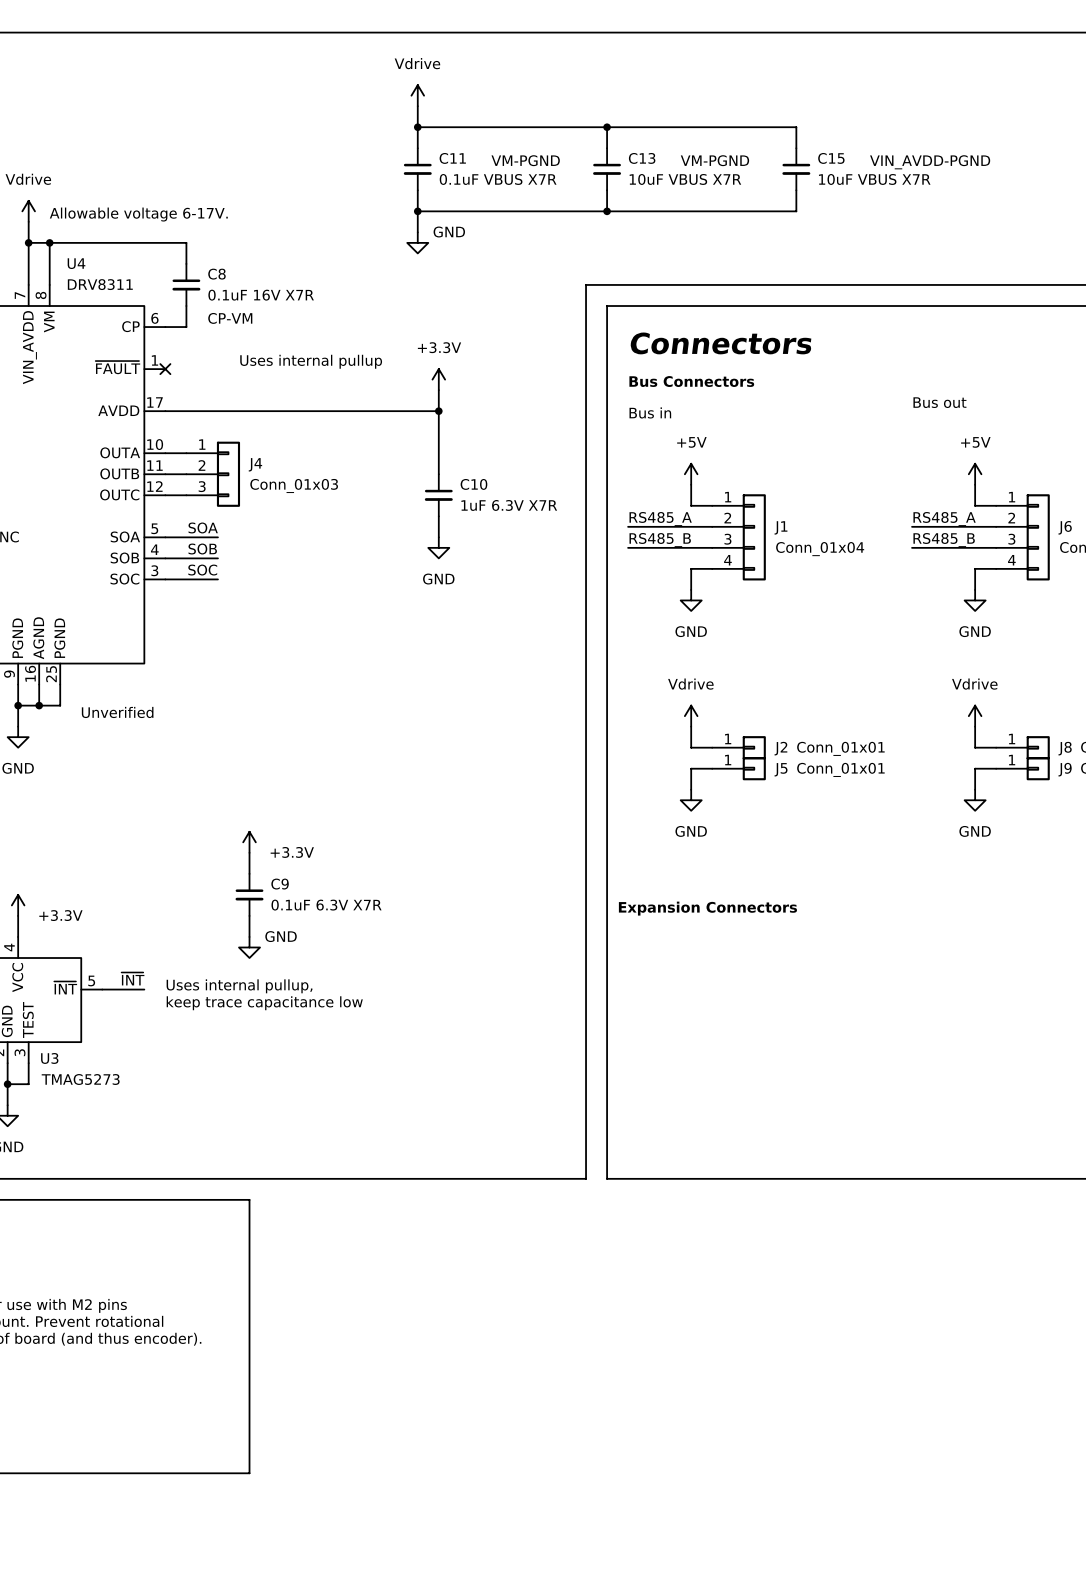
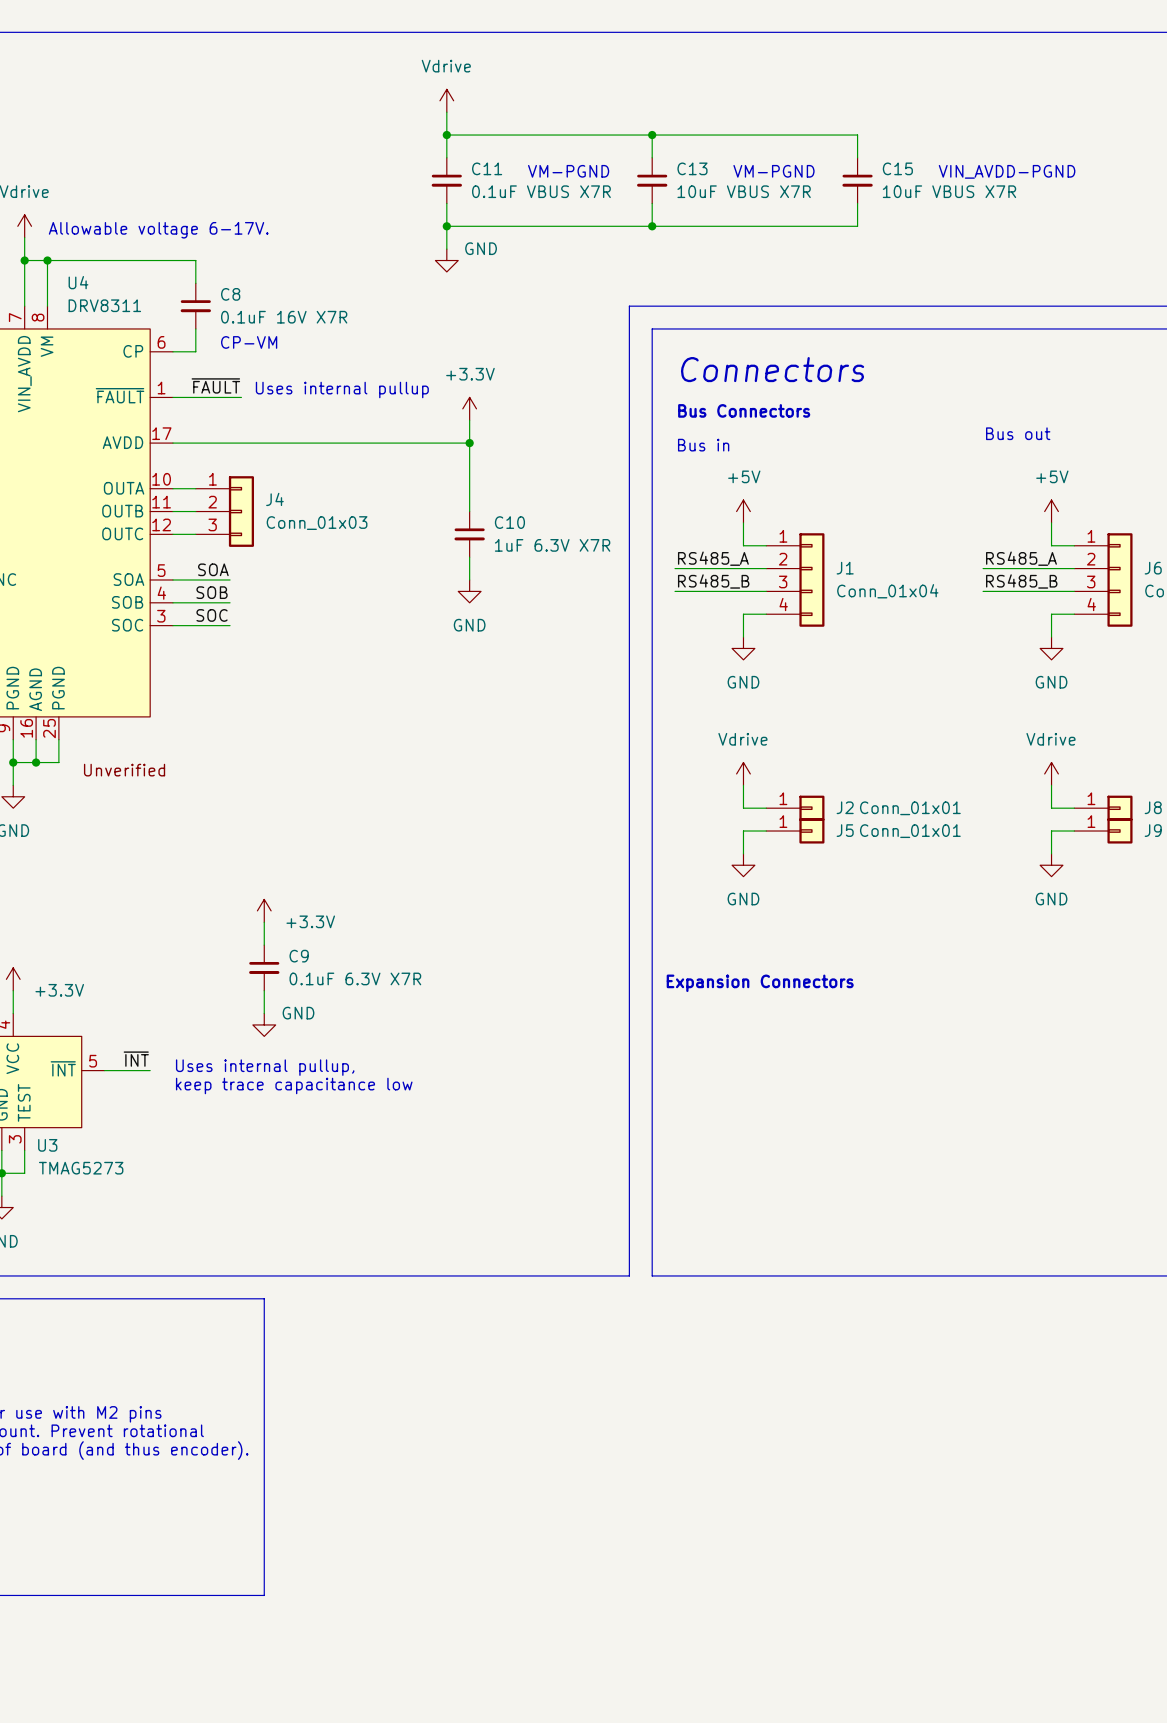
label: none -> ~{FAULT} (215, 385)
wire: none -> (172, 397) (241, 397)
no-connect mark: (165, 369) -> none

